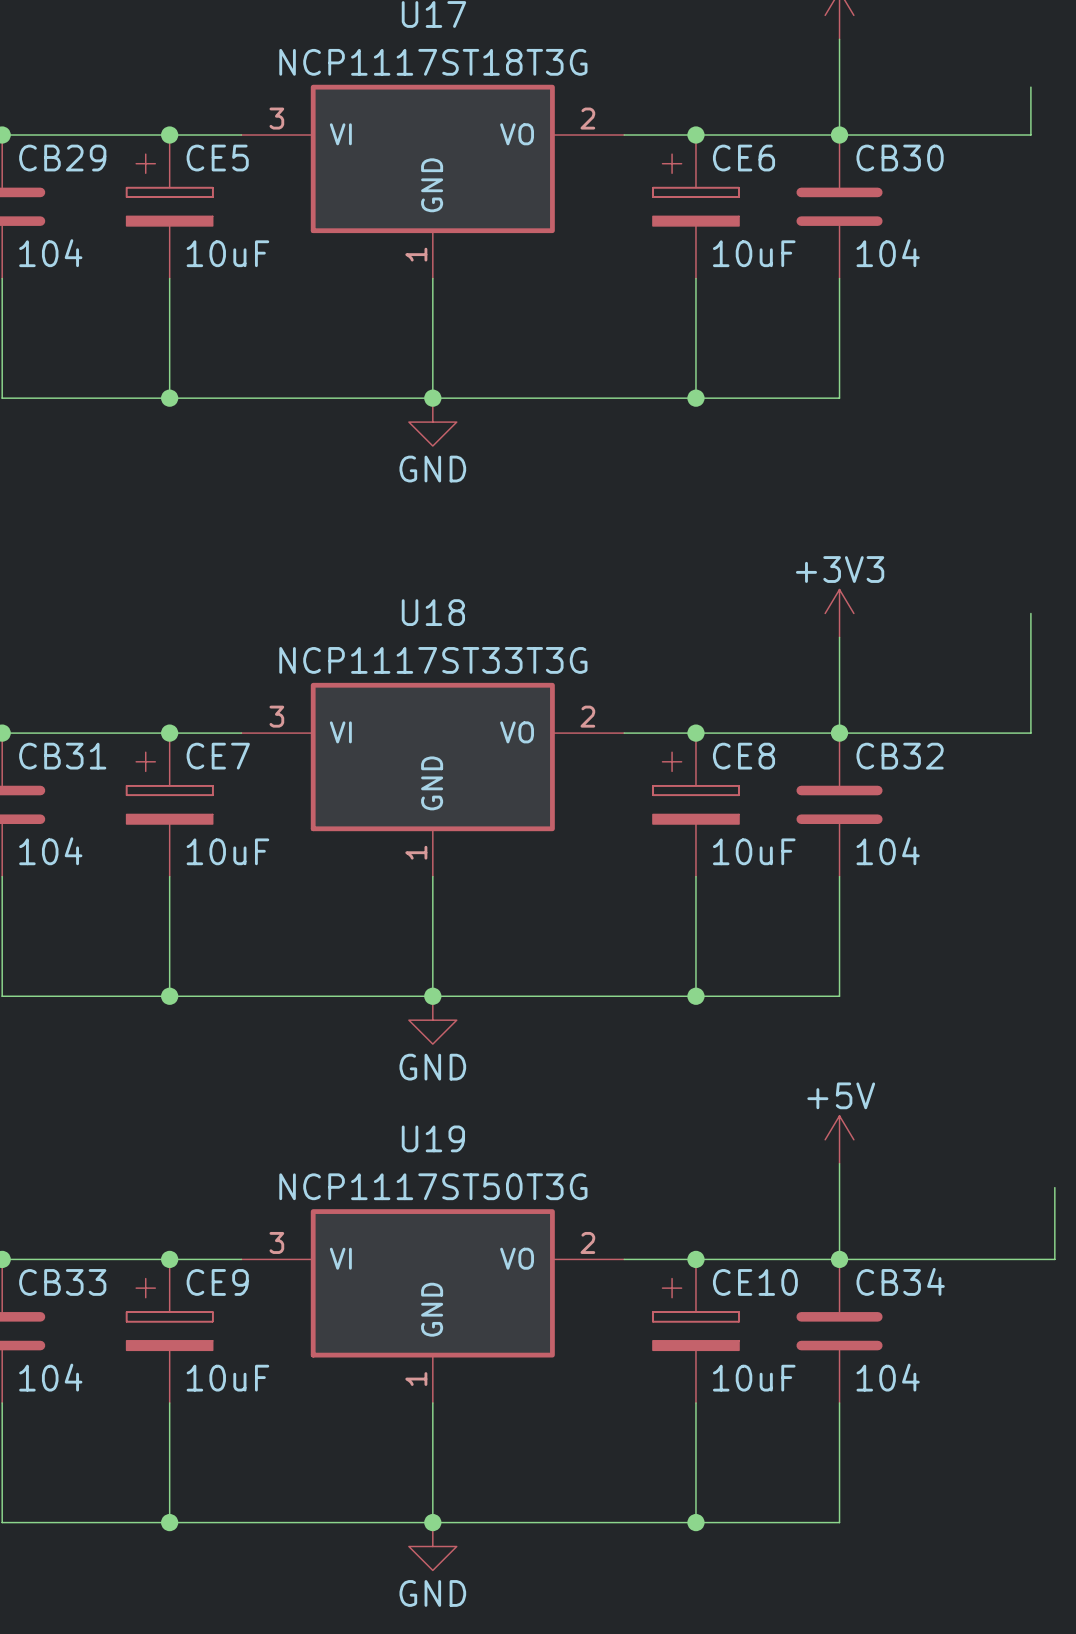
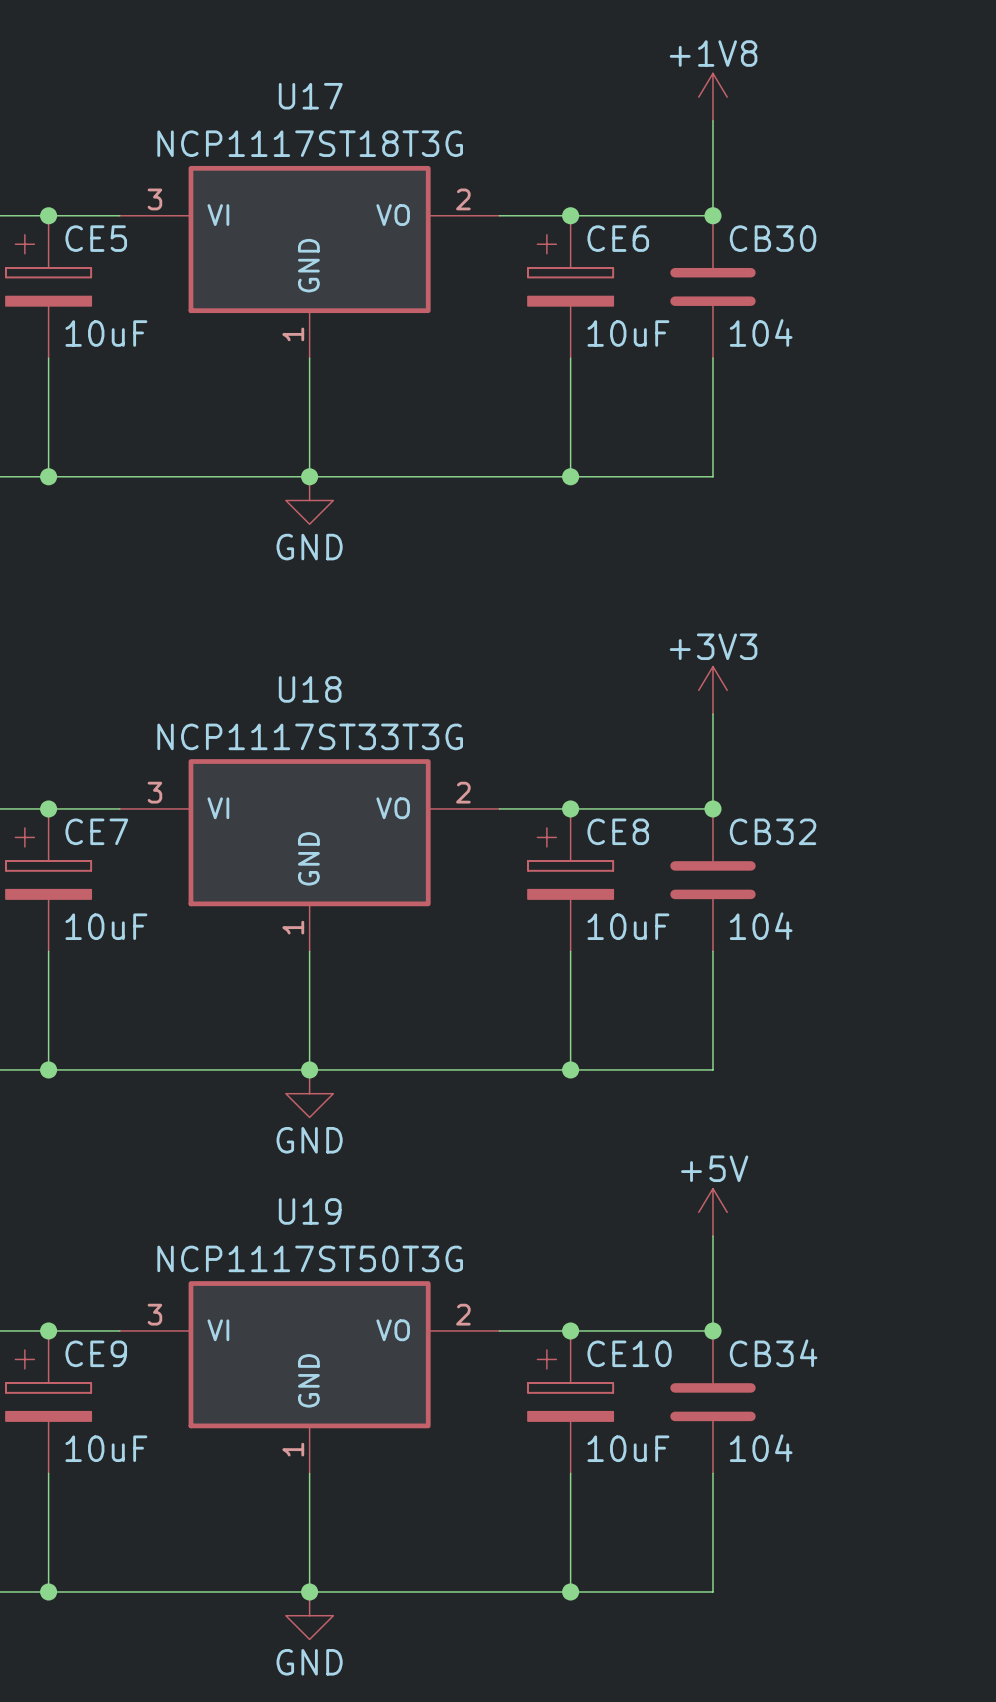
wire: (1030, 87) (1030, 135) (839, 135) -> none
wire: (1030, 613) (1030, 733) (839, 733) -> none
wire: (1054, 1187) (1054, 1259) (839, 1259) -> none

